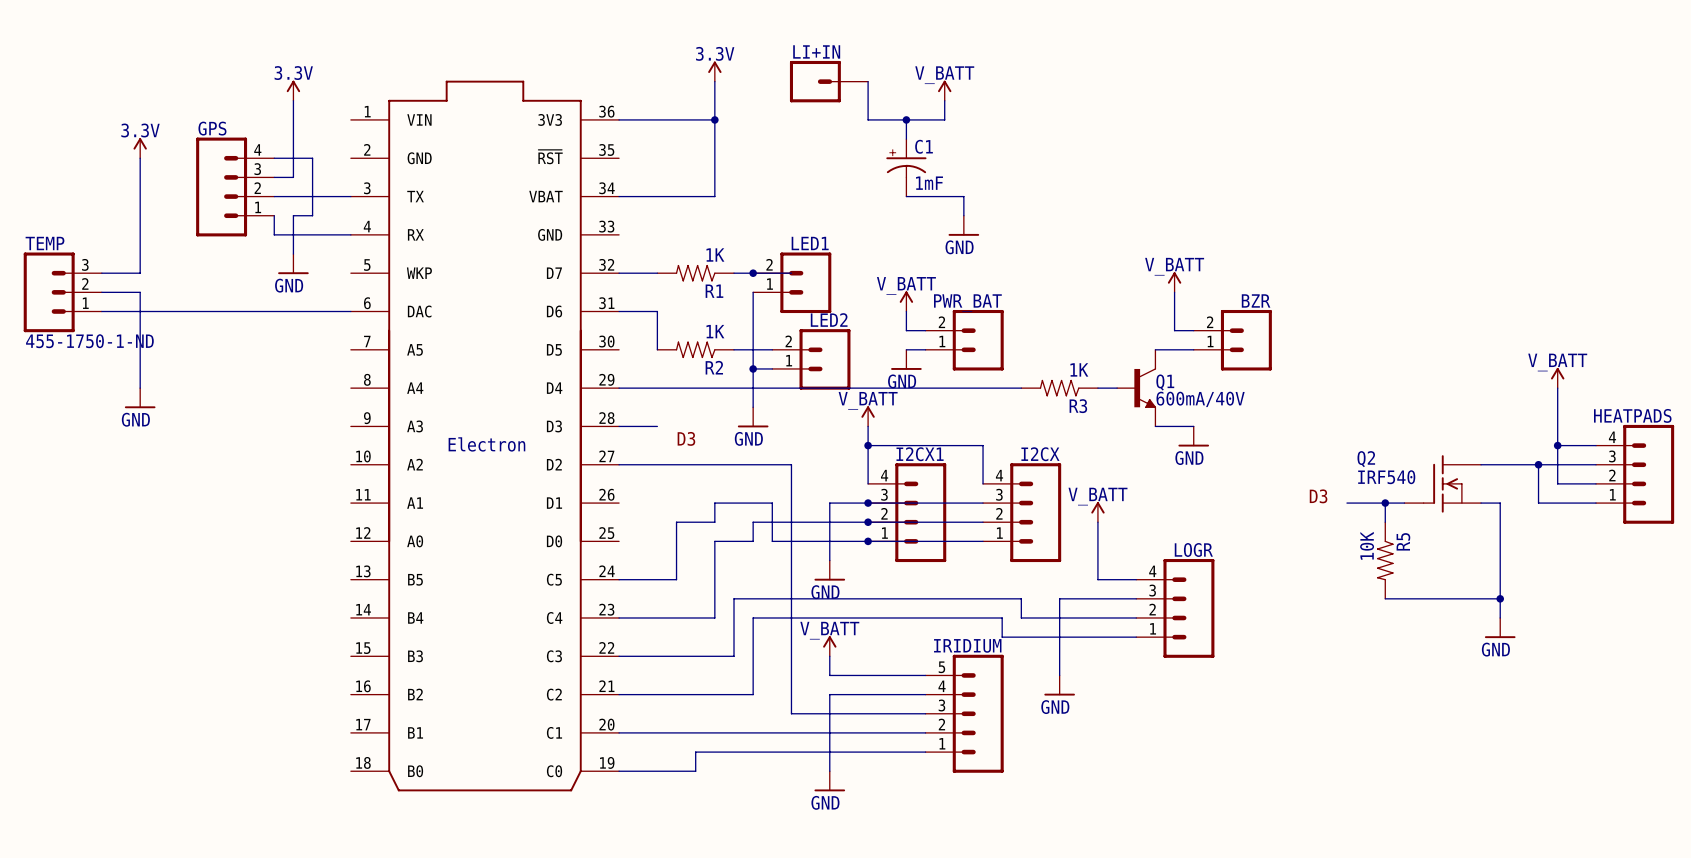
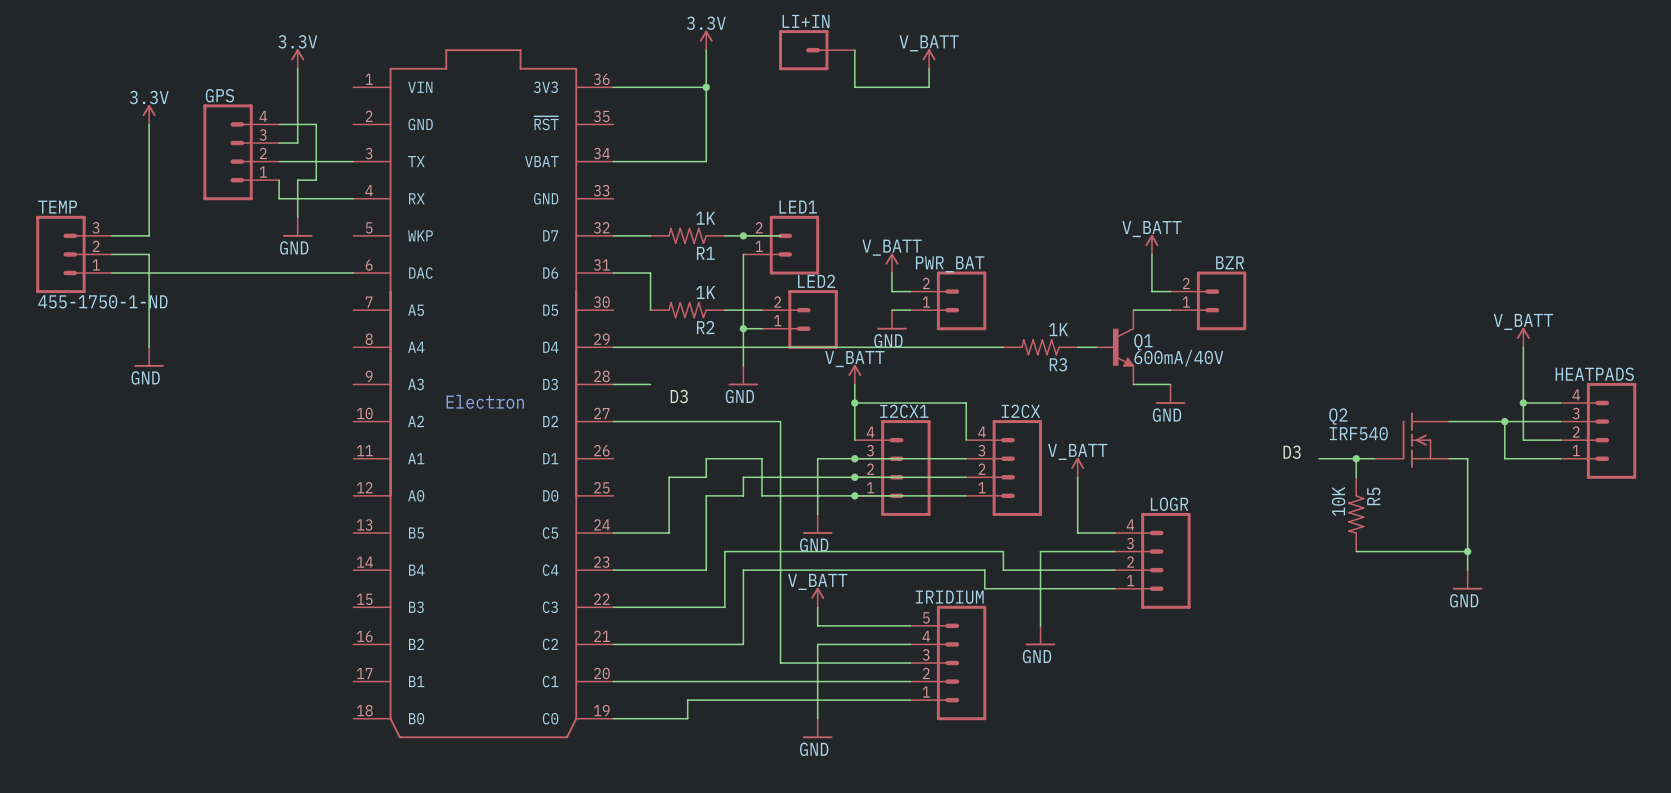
wire: (906, 119) (906, 139) -> none
junction: (906, 119) -> none
C1: 1mF (906, 167) -> none
wire: (906, 196) (963, 196) (963, 215) -> none
power symbol: GND (963, 225) -> none

